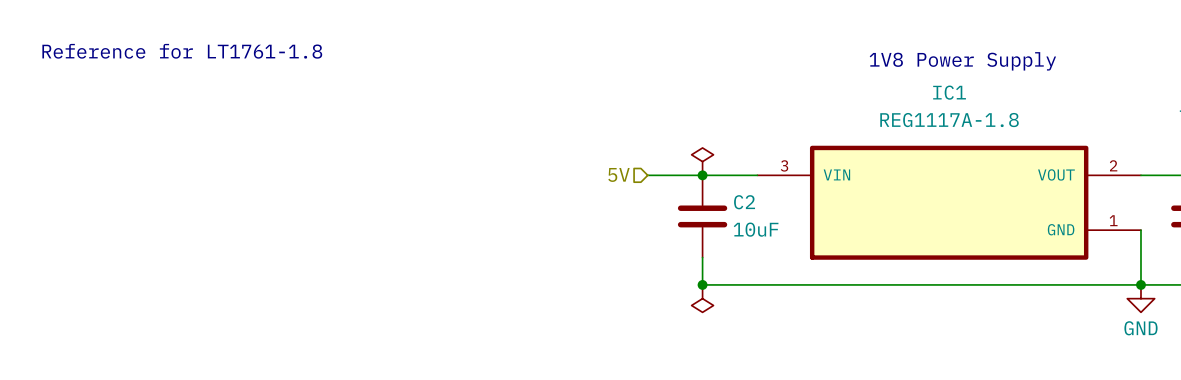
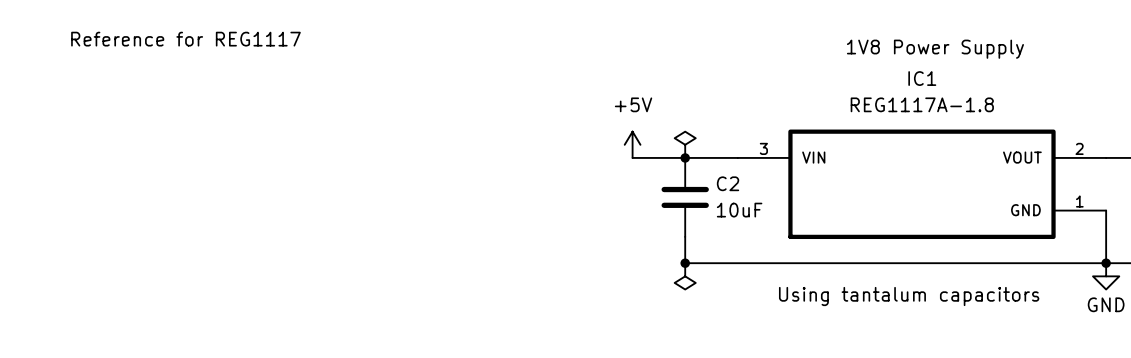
text: Reference for LT1761-1.8 (182, 51) -> Reference for REG1117 (185, 39)
power symbol: none -> +5V (632, 144)
hierarchical label: 5V (618, 174) -> none
text: none -> Using tantalum capacitors (909, 296)

